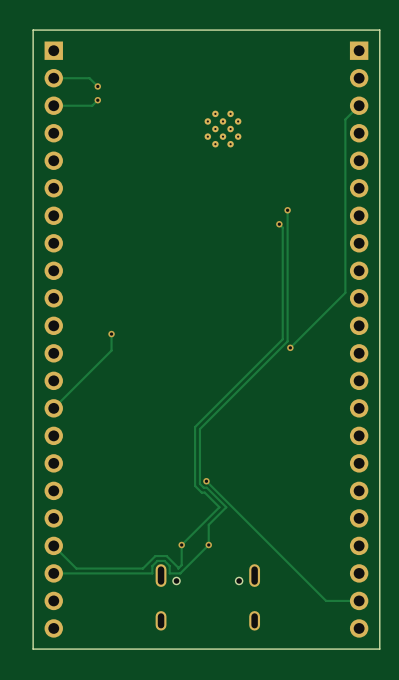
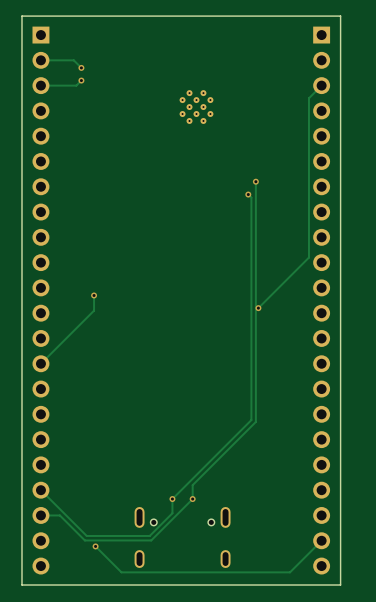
track: (282, 339) (195, 427) (195, 485) (219, 507) (181, 545) (181, 565) (178, 568) (166, 556) (155, 556) (142, 568) (76, 568) -> (251, 300) (251, 420) (172, 499) (172, 513) (149, 535) (86, 535) (61, 510)
track: (287, 341) (199, 429) (199, 483) (206, 487) (226, 507) (208, 524) (208, 545) (180, 573) (169, 573) (169, 566) (164, 560) (157, 560) (152, 566) (152, 573) (74, 573) -> (255, 302) (255, 421) (192, 485) (192, 499) (151, 540) (84, 540) (59, 515)
track: (206, 481) (326, 600) (359, 600) -> (95, 546) (121, 572) (290, 572) (321, 540)
via: (206, 481) -> none
via: (181, 545) -> none
via: (208, 545) -> none
via: none -> (172, 499)
via: none -> (192, 499)
via: none -> (95, 546)

